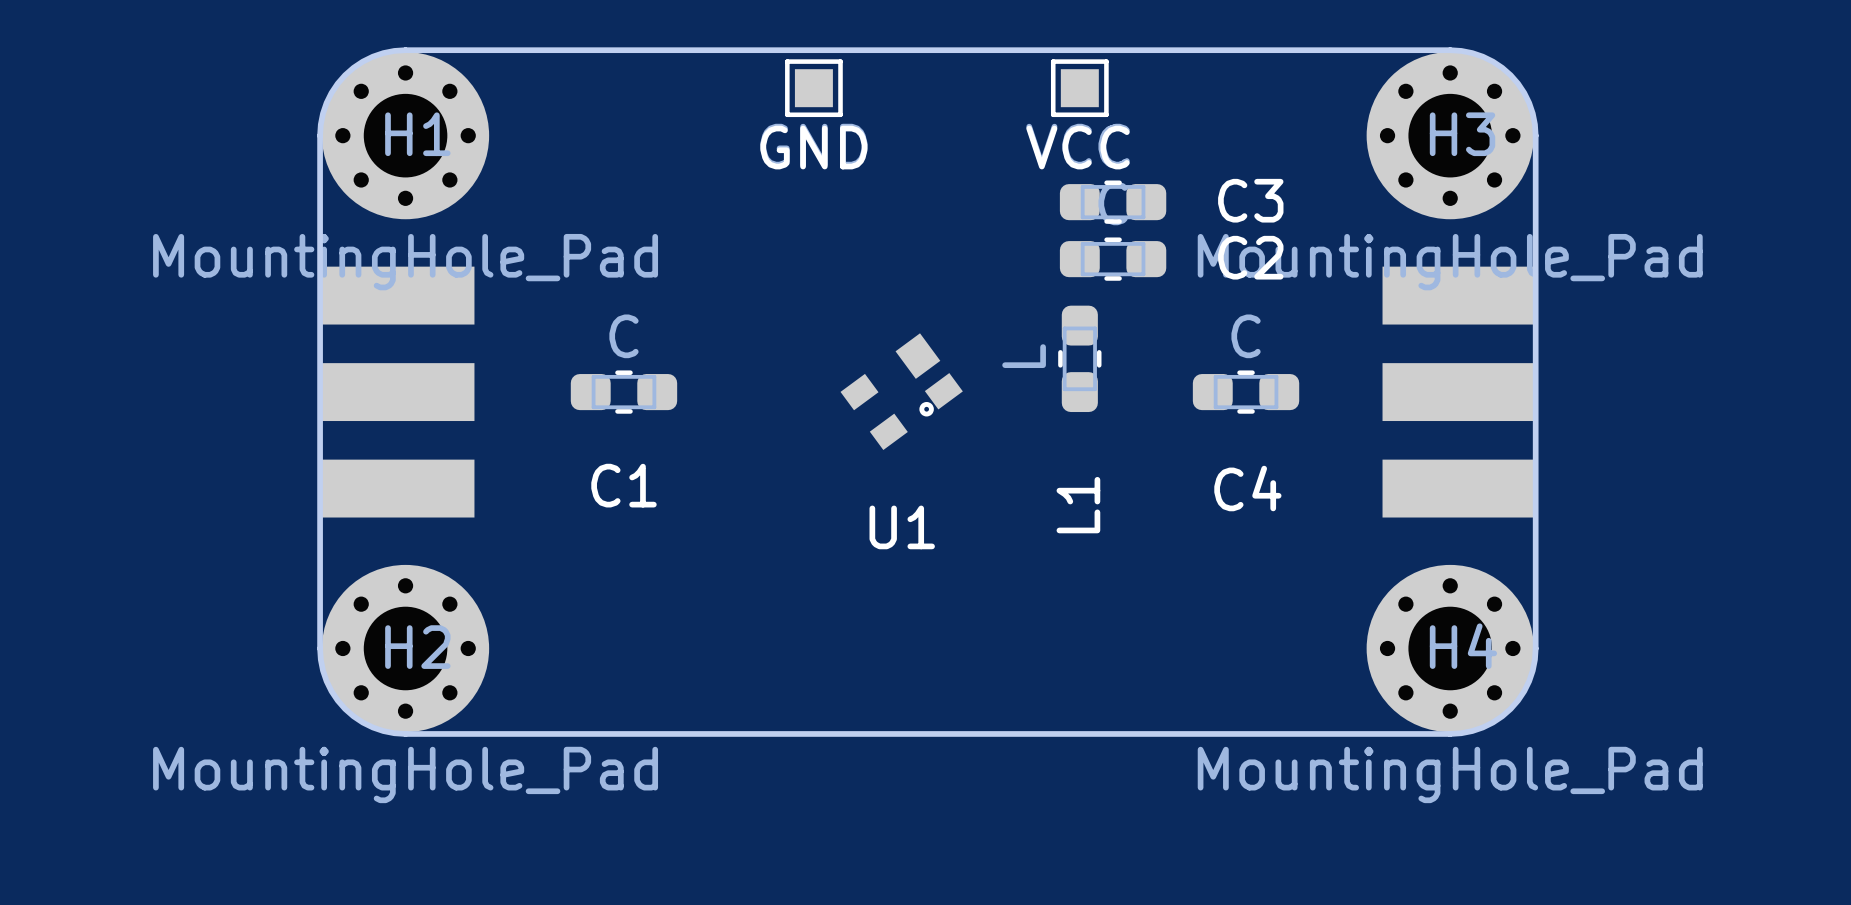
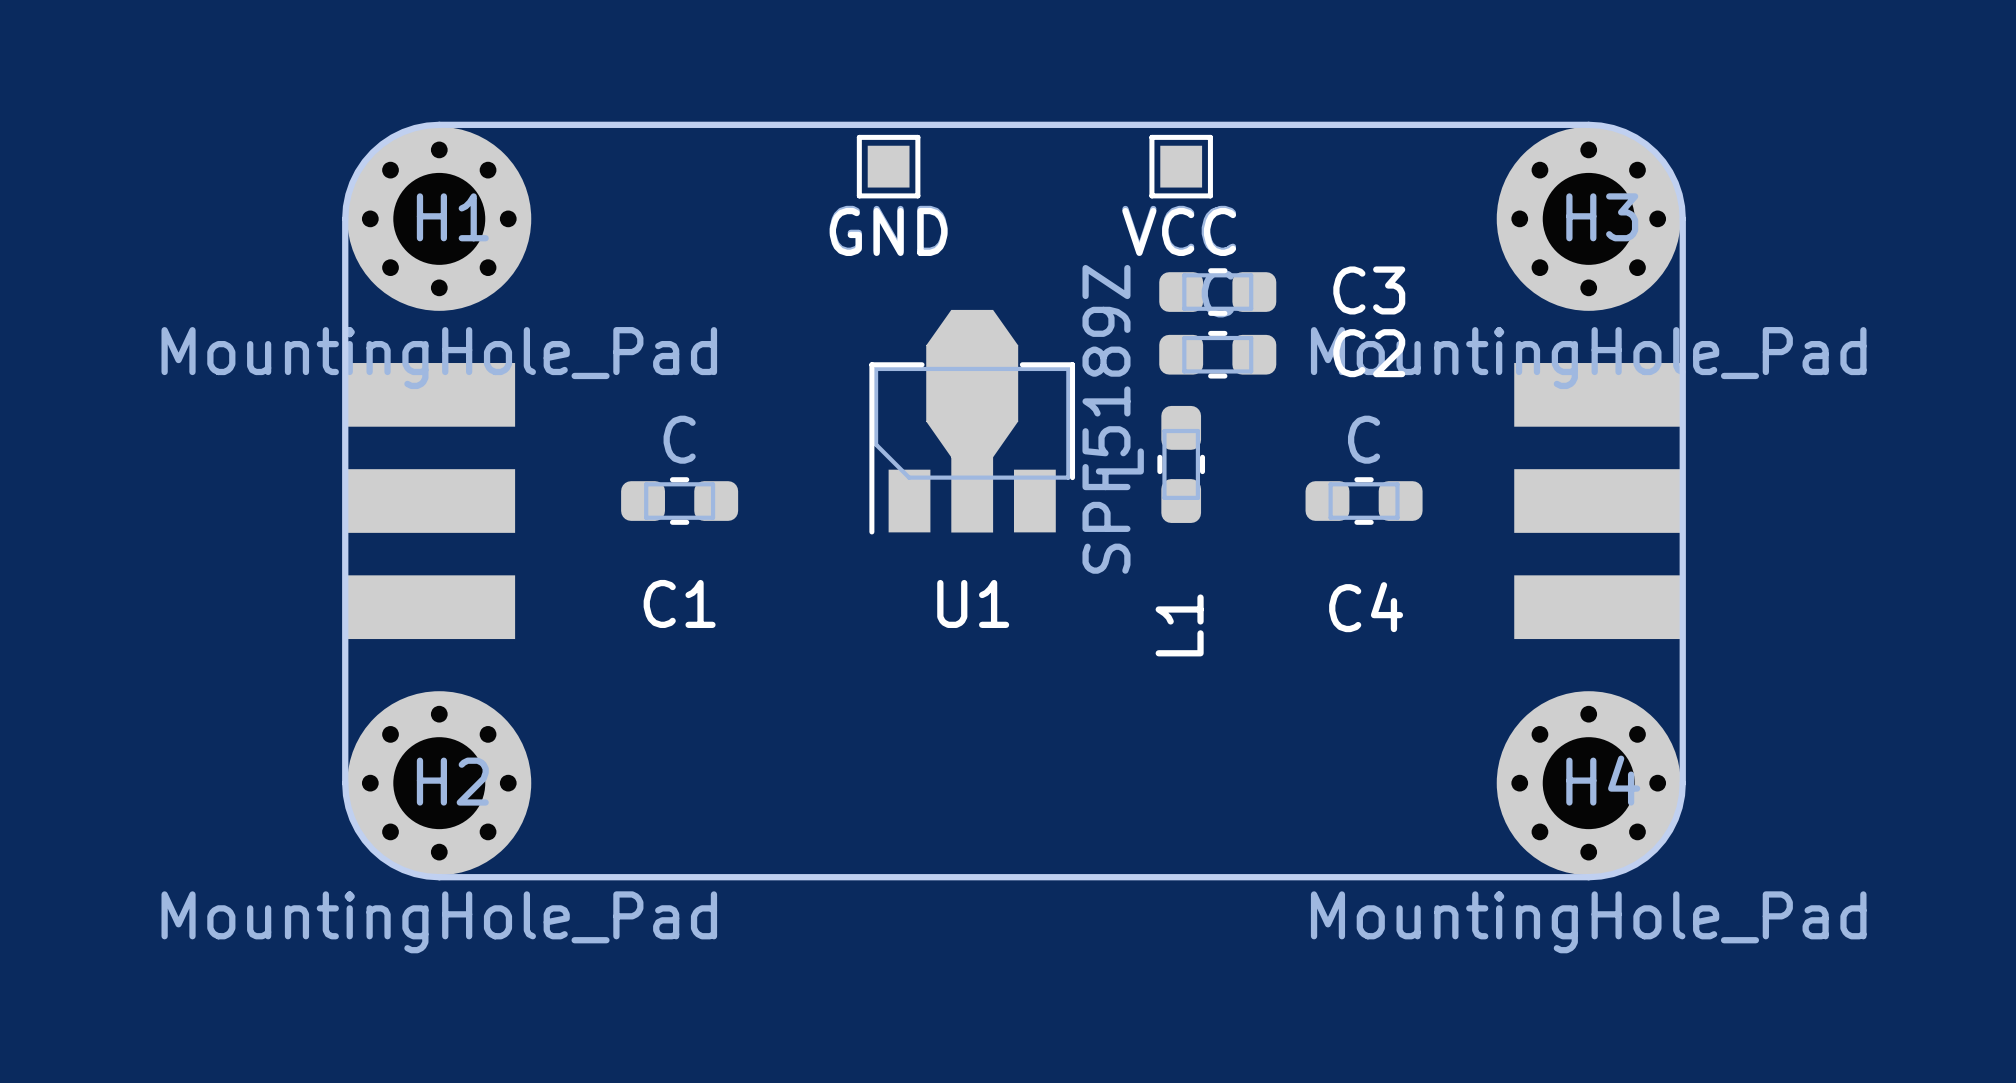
U1 value: none -> SPF5189Z (1106, 419)
U1 footprint: [840, 333, 963, 451] -> [869, 309, 1076, 535]

